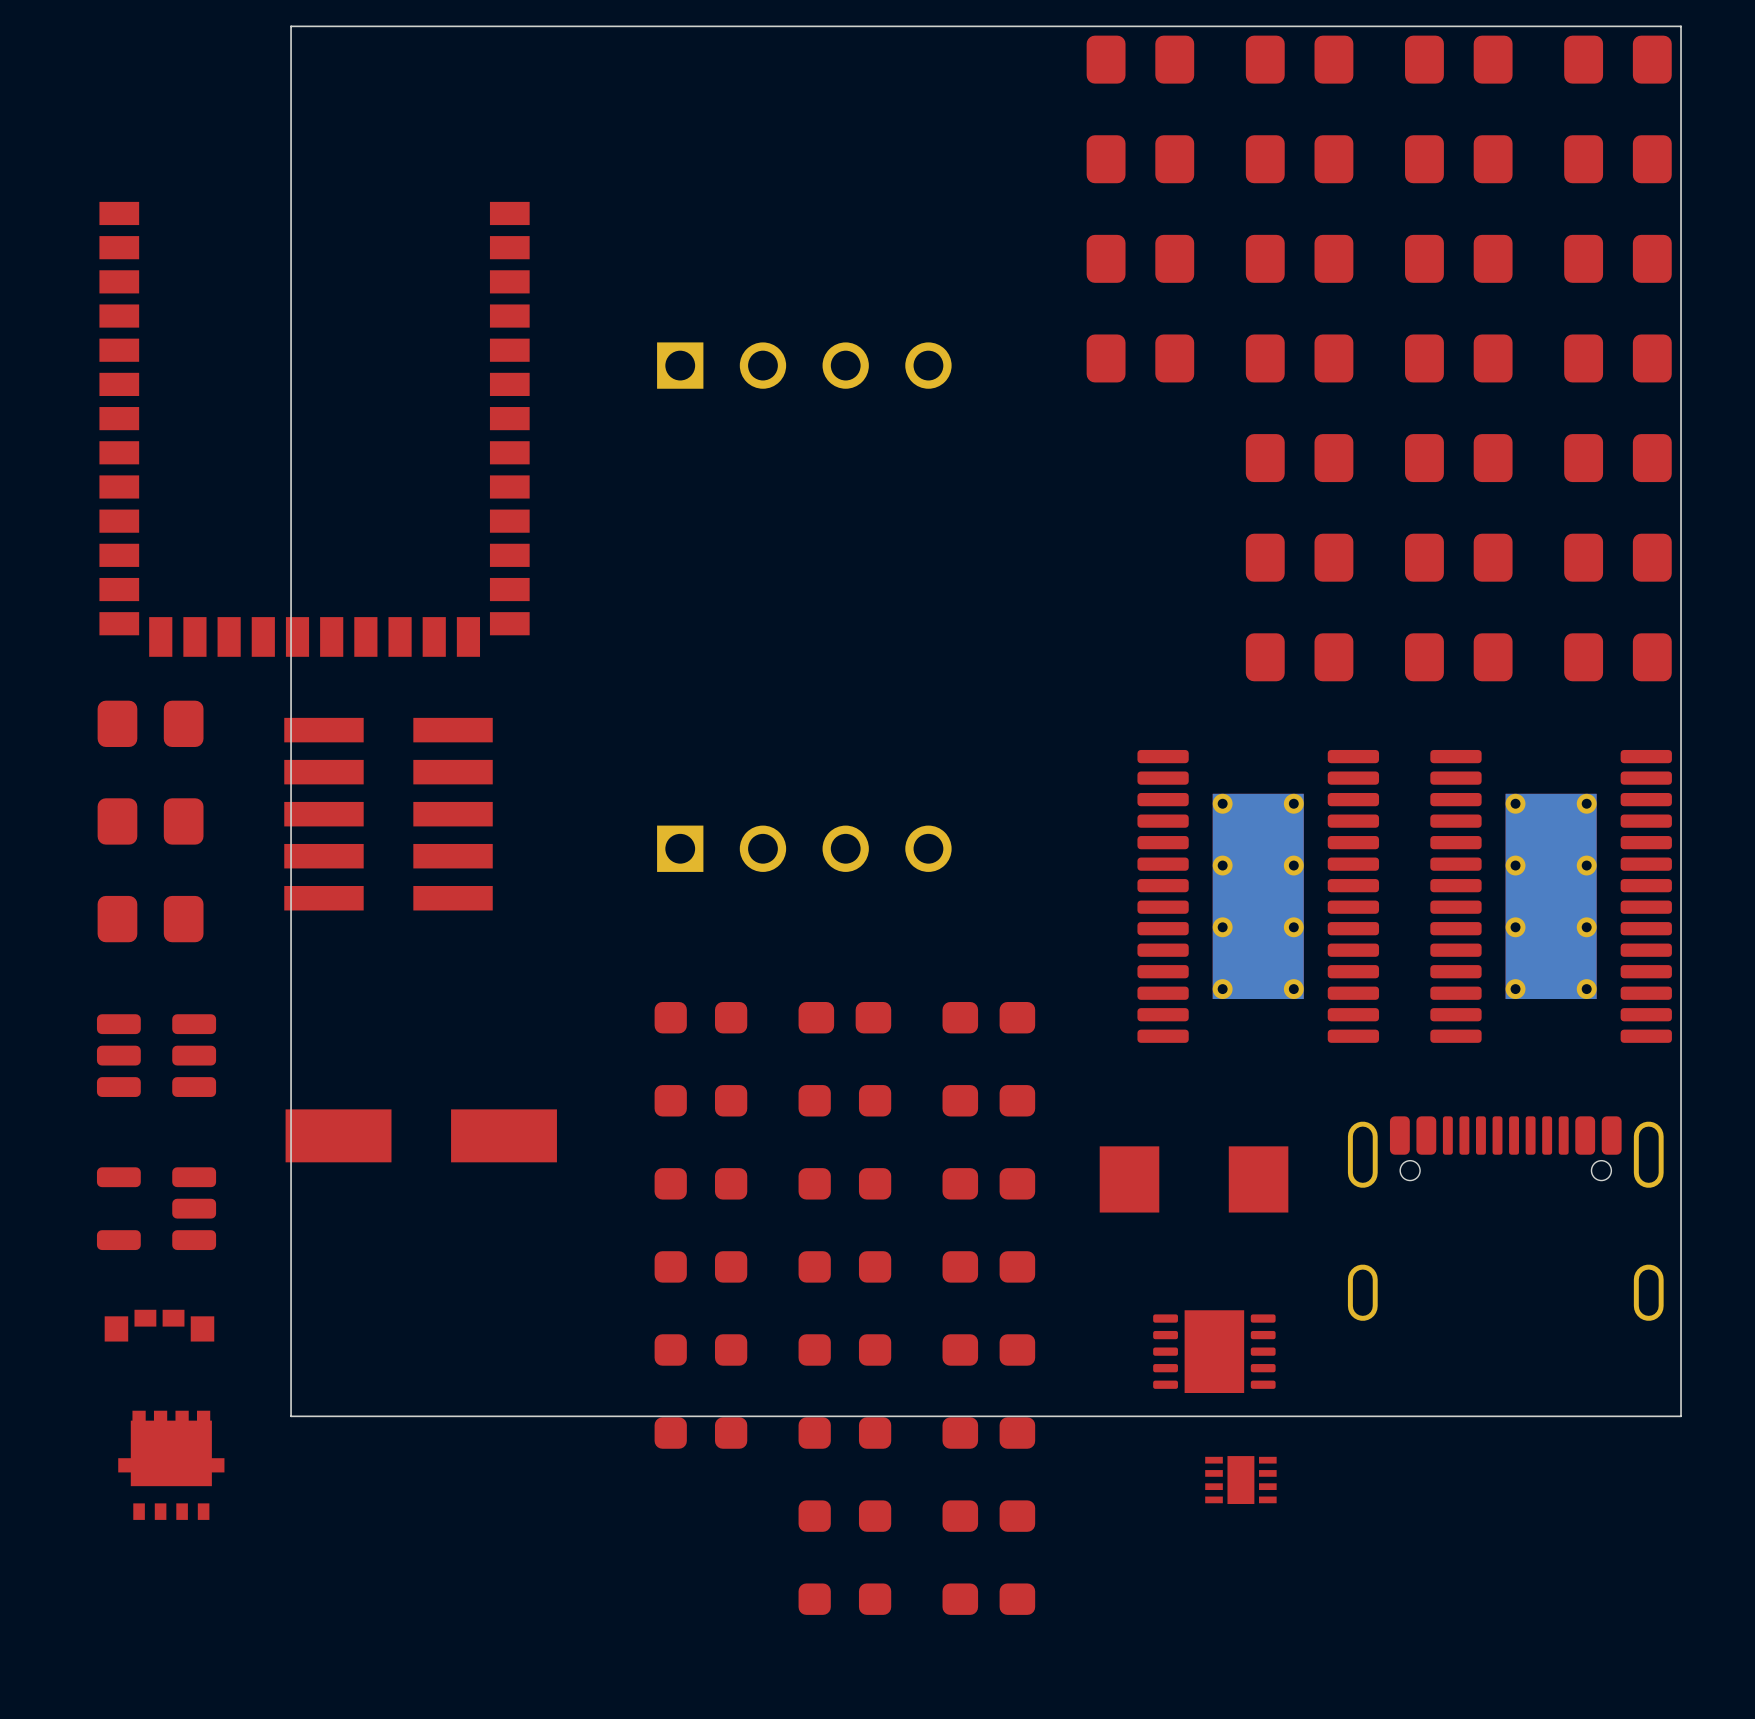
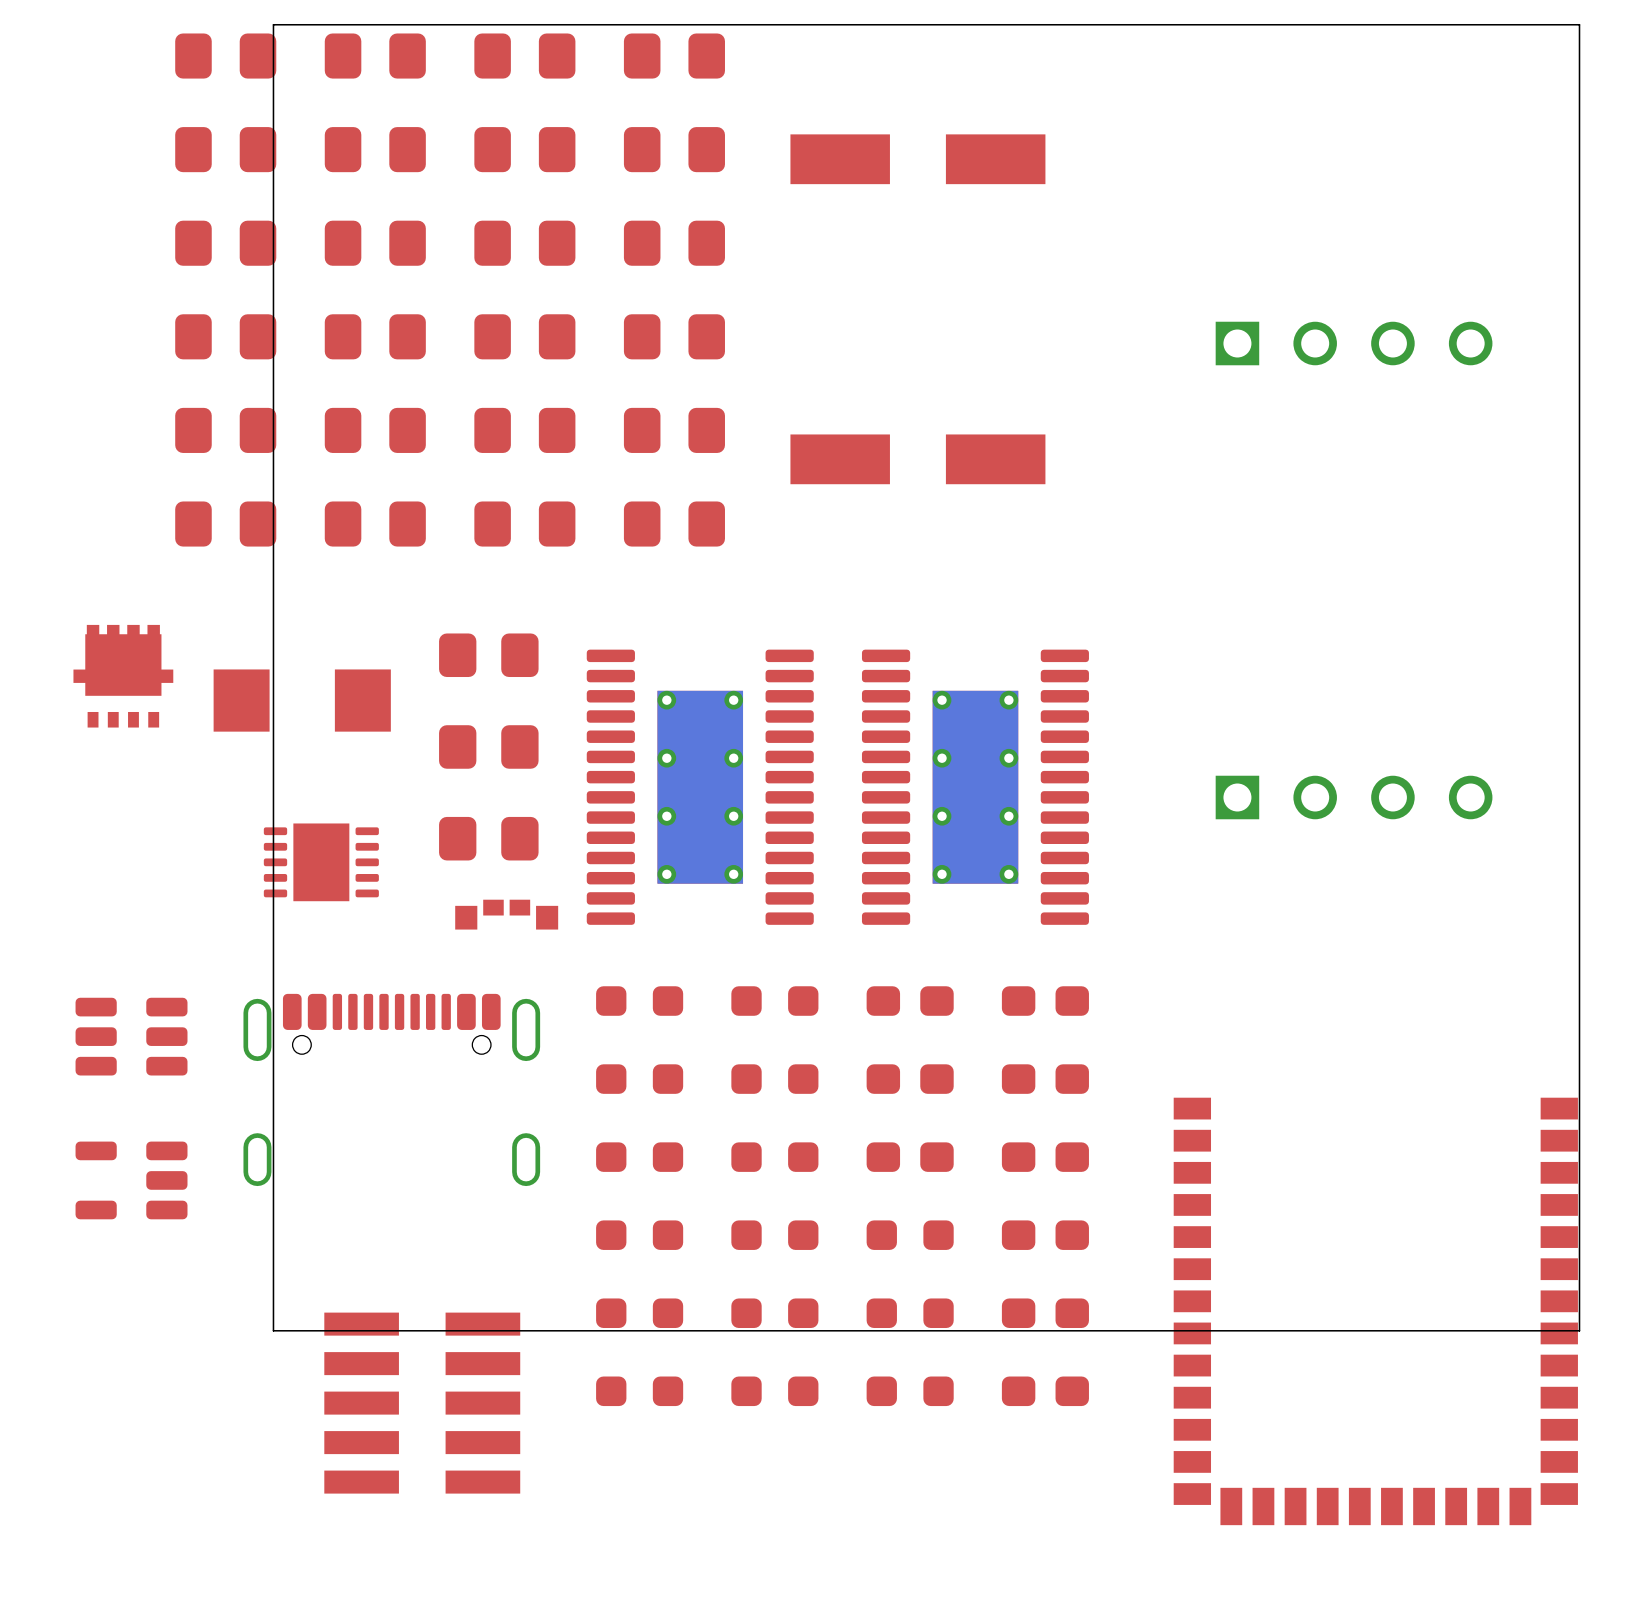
part: none -> (225, 56)
part: none -> (375, 56)
part: none -> (524, 56)
part: none -> (674, 56)
part: (1140, 59) -> none
part: (1299, 59) -> none
part: (1458, 59) -> none
part: (1617, 59) -> none
part: none -> (225, 149)
part: none -> (375, 149)
part: none -> (524, 149)
part: none -> (674, 149)
part: (1140, 159) -> none
part: (1299, 159) -> none
part: (1458, 159) -> none
part: (1617, 159) -> none
part: none -> (917, 159)
part: none -> (225, 243)
part: none -> (375, 243)
part: none -> (524, 243)
part: none -> (674, 243)
part: (1140, 258) -> none
part: (1299, 258) -> none
part: (1458, 258) -> none
part: (1617, 258) -> none
part footprint: [1405, 334, 1513, 383] -> [1215, 321, 1493, 366]
part: none -> (225, 336)
part: none -> (375, 336)
part: none -> (524, 336)
part: none -> (674, 336)
part: (1140, 358) -> none
part: (1299, 358) -> none
part: (1617, 358) -> none
part: (804, 365) -> none
part: (314, 429) -> none
part: none -> (225, 430)
part: none -> (375, 430)
part: none -> (524, 430)
part: none -> (674, 430)
part: (1299, 458) -> none
part: (1458, 458) -> none
part: (1617, 458) -> none
part: none -> (917, 459)
part: none -> (225, 524)
part: none -> (375, 524)
part: none -> (524, 524)
part: none -> (674, 524)
part: (1299, 557) -> none
part: (1458, 557) -> none
part: (1617, 557) -> none
part: (1299, 657) -> none
part: (1458, 657) -> none
part: (1617, 657) -> none
part: none -> (488, 655)
part footprint: [97, 700, 204, 747] -> [73, 624, 174, 728]
part: none -> (302, 700)
part: none -> (488, 746)
part position: (388, 814) -> (422, 1403)
part: (150, 821) -> none
part: none -> (700, 787)
part: (804, 848) -> none
part: none -> (1354, 797)
part: none -> (488, 838)
part position: (1258, 896) -> (975, 787)
part: (1551, 896) -> none
part: none -> (321, 862)
part: (150, 919) -> none
part: (700, 1017) -> none
part: (844, 1017) -> none
part: (988, 1017) -> none
part position: (156, 1055) -> (131, 1036)
part: none -> (639, 1001)
part: none -> (774, 1001)
part: none -> (910, 1001)
part: none -> (1045, 1001)
part: (700, 1100) -> none
part: (844, 1100) -> none
part: (988, 1100) -> none
part footprint: [285, 1109, 557, 1163] -> [243, 993, 541, 1187]
part: none -> (639, 1079)
part: none -> (774, 1079)
part: none -> (910, 1079)
part: none -> (1045, 1079)
part: (1194, 1179) -> none
part: (700, 1183) -> none
part: (844, 1183) -> none
part: (988, 1183) -> none
part position: (156, 1208) -> (131, 1180)
part: (1505, 1218) -> none
part: none -> (639, 1157)
part: none -> (774, 1157)
part: none -> (910, 1157)
part: none -> (1045, 1157)
part: (700, 1266) -> none
part: (844, 1266) -> none
part: (988, 1266) -> none
part: none -> (639, 1235)
part: none -> (774, 1235)
part: none -> (910, 1235)
part: none -> (1045, 1235)
part position: (159, 1325) -> (506, 914)
part: (700, 1349) -> none
part: (844, 1349) -> none
part: (988, 1349) -> none
part: (1214, 1351) -> none
part: none -> (1375, 1311)
part: none -> (639, 1313)
part: none -> (774, 1313)
part: none -> (910, 1313)
part: none -> (1045, 1313)
part: (700, 1433) -> none
part: (844, 1433) -> none
part: (988, 1433) -> none
part: (171, 1465) -> none
part: none -> (639, 1391)
part: none -> (774, 1391)
part: none -> (910, 1391)
part: none -> (1045, 1391)
part: (1240, 1480) -> none
part: (844, 1516) -> none
part: (988, 1516) -> none
part: (844, 1599) -> none
part: (988, 1599) -> none

